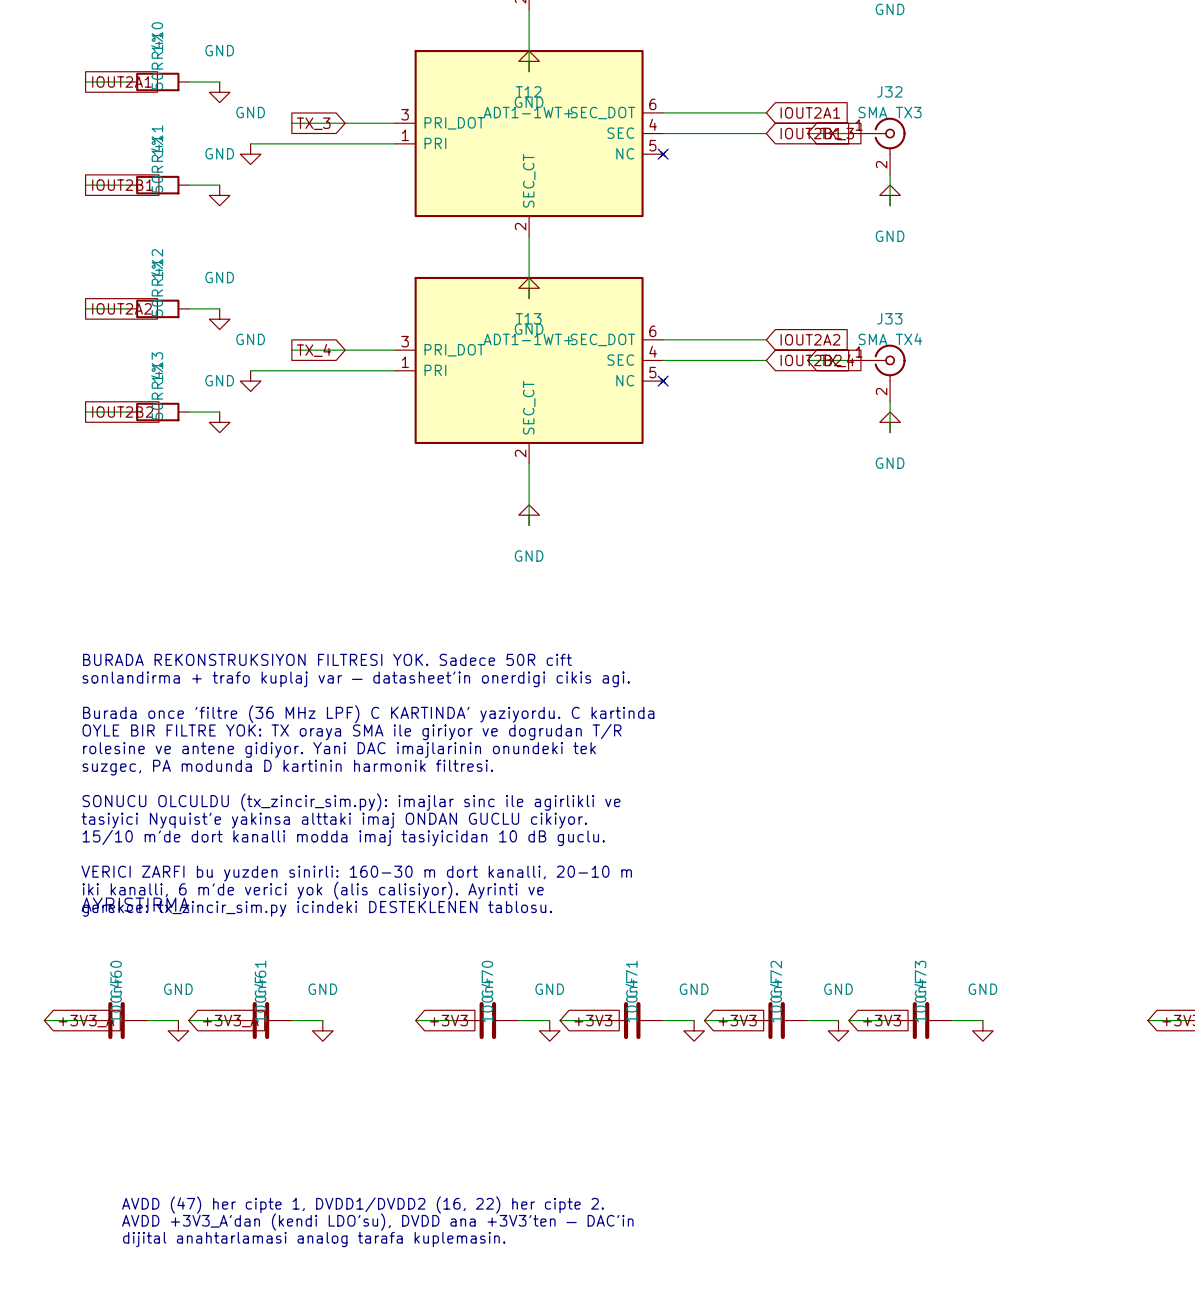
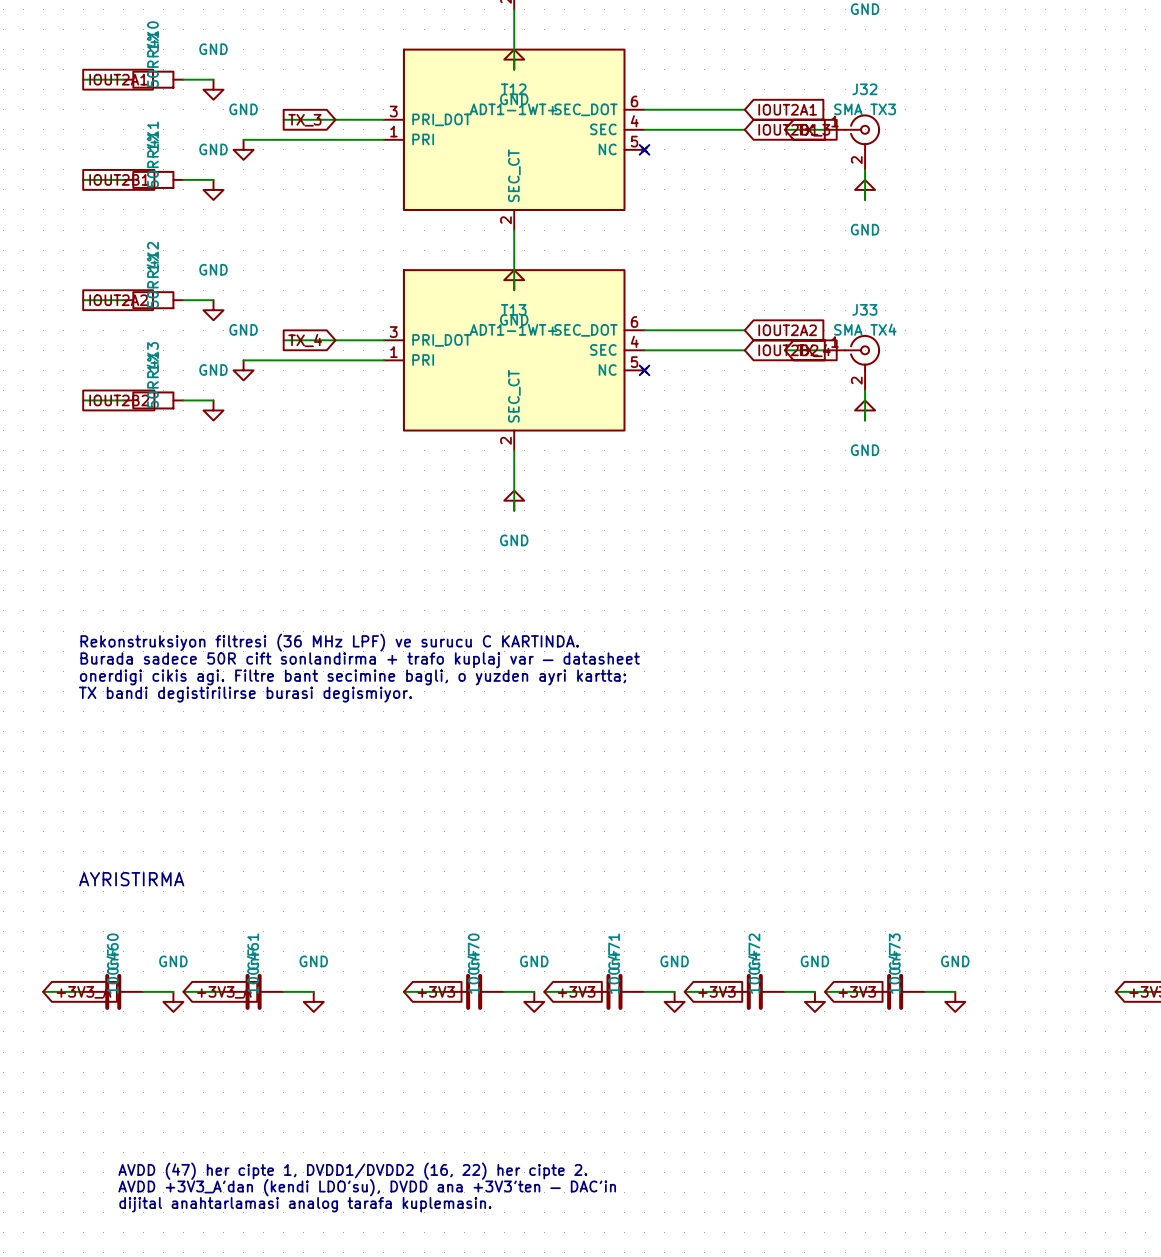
text: BURADA REKONSTRUKSIYON FILTRESI YOK. Sadece 50R cift (327, 659) -> Rekonstruksiyon filtresi (36 MHz LPF) ve surucu C KARTINDA. (329, 642)
text: sonlandirma + trafo kuplaj var — datasheet'in onerdigi cikis agi. (356, 679) -> Burada sadece 50R cift sonlandirma + trafo kuplaj var — datasheet (360, 660)
text: none -> onerdigi cikis agi. Filtre bant secimine bagli, o yuzden ayri kartta; (353, 677)
text: Burada once 'filtre (36 MHz LPF) C KARTINDA' yaziyordu. C kartinda (368, 714) -> TX bandi degistirilirse burasi degismiyor. (245, 694)
text: OYLE BIR FILTRE YOK: TX oraya SMA ile giriyor ve dogrudan T/R (352, 732) -> none
text: rolesine ve antene gidiyor. Yani DAC imajlarinin onundeki tek (339, 749) -> none
text: suzgec, PA modunda D kartinin harmonik filtresi. (287, 767) -> none
text: SONUCU OLCULDU (tx_zincir_sim.py): imajlar sinc ile agirlikli ve (351, 802) -> none
text: tasiyici Nyquist'e yakinsa alttaki imaj ONDAN GUCLU cikiyor. (334, 820) -> none
text: 15/10 m'de dort kanalli modda imaj tasiyicidan 10 dB guclu. (343, 837) -> none
text: VERICI ZARFI bu yuzden sinirli: 160-30 m dort kanalli, 20-10 m (356, 873) -> none
text: iki kanalli, 6 m'de verici yok (alis calisiyor). Ayrinti ve (313, 890) -> none
text: gerekce: tx_zincir_sim.py icindeki DESTEKLENEN tablosu. (317, 908) -> none

